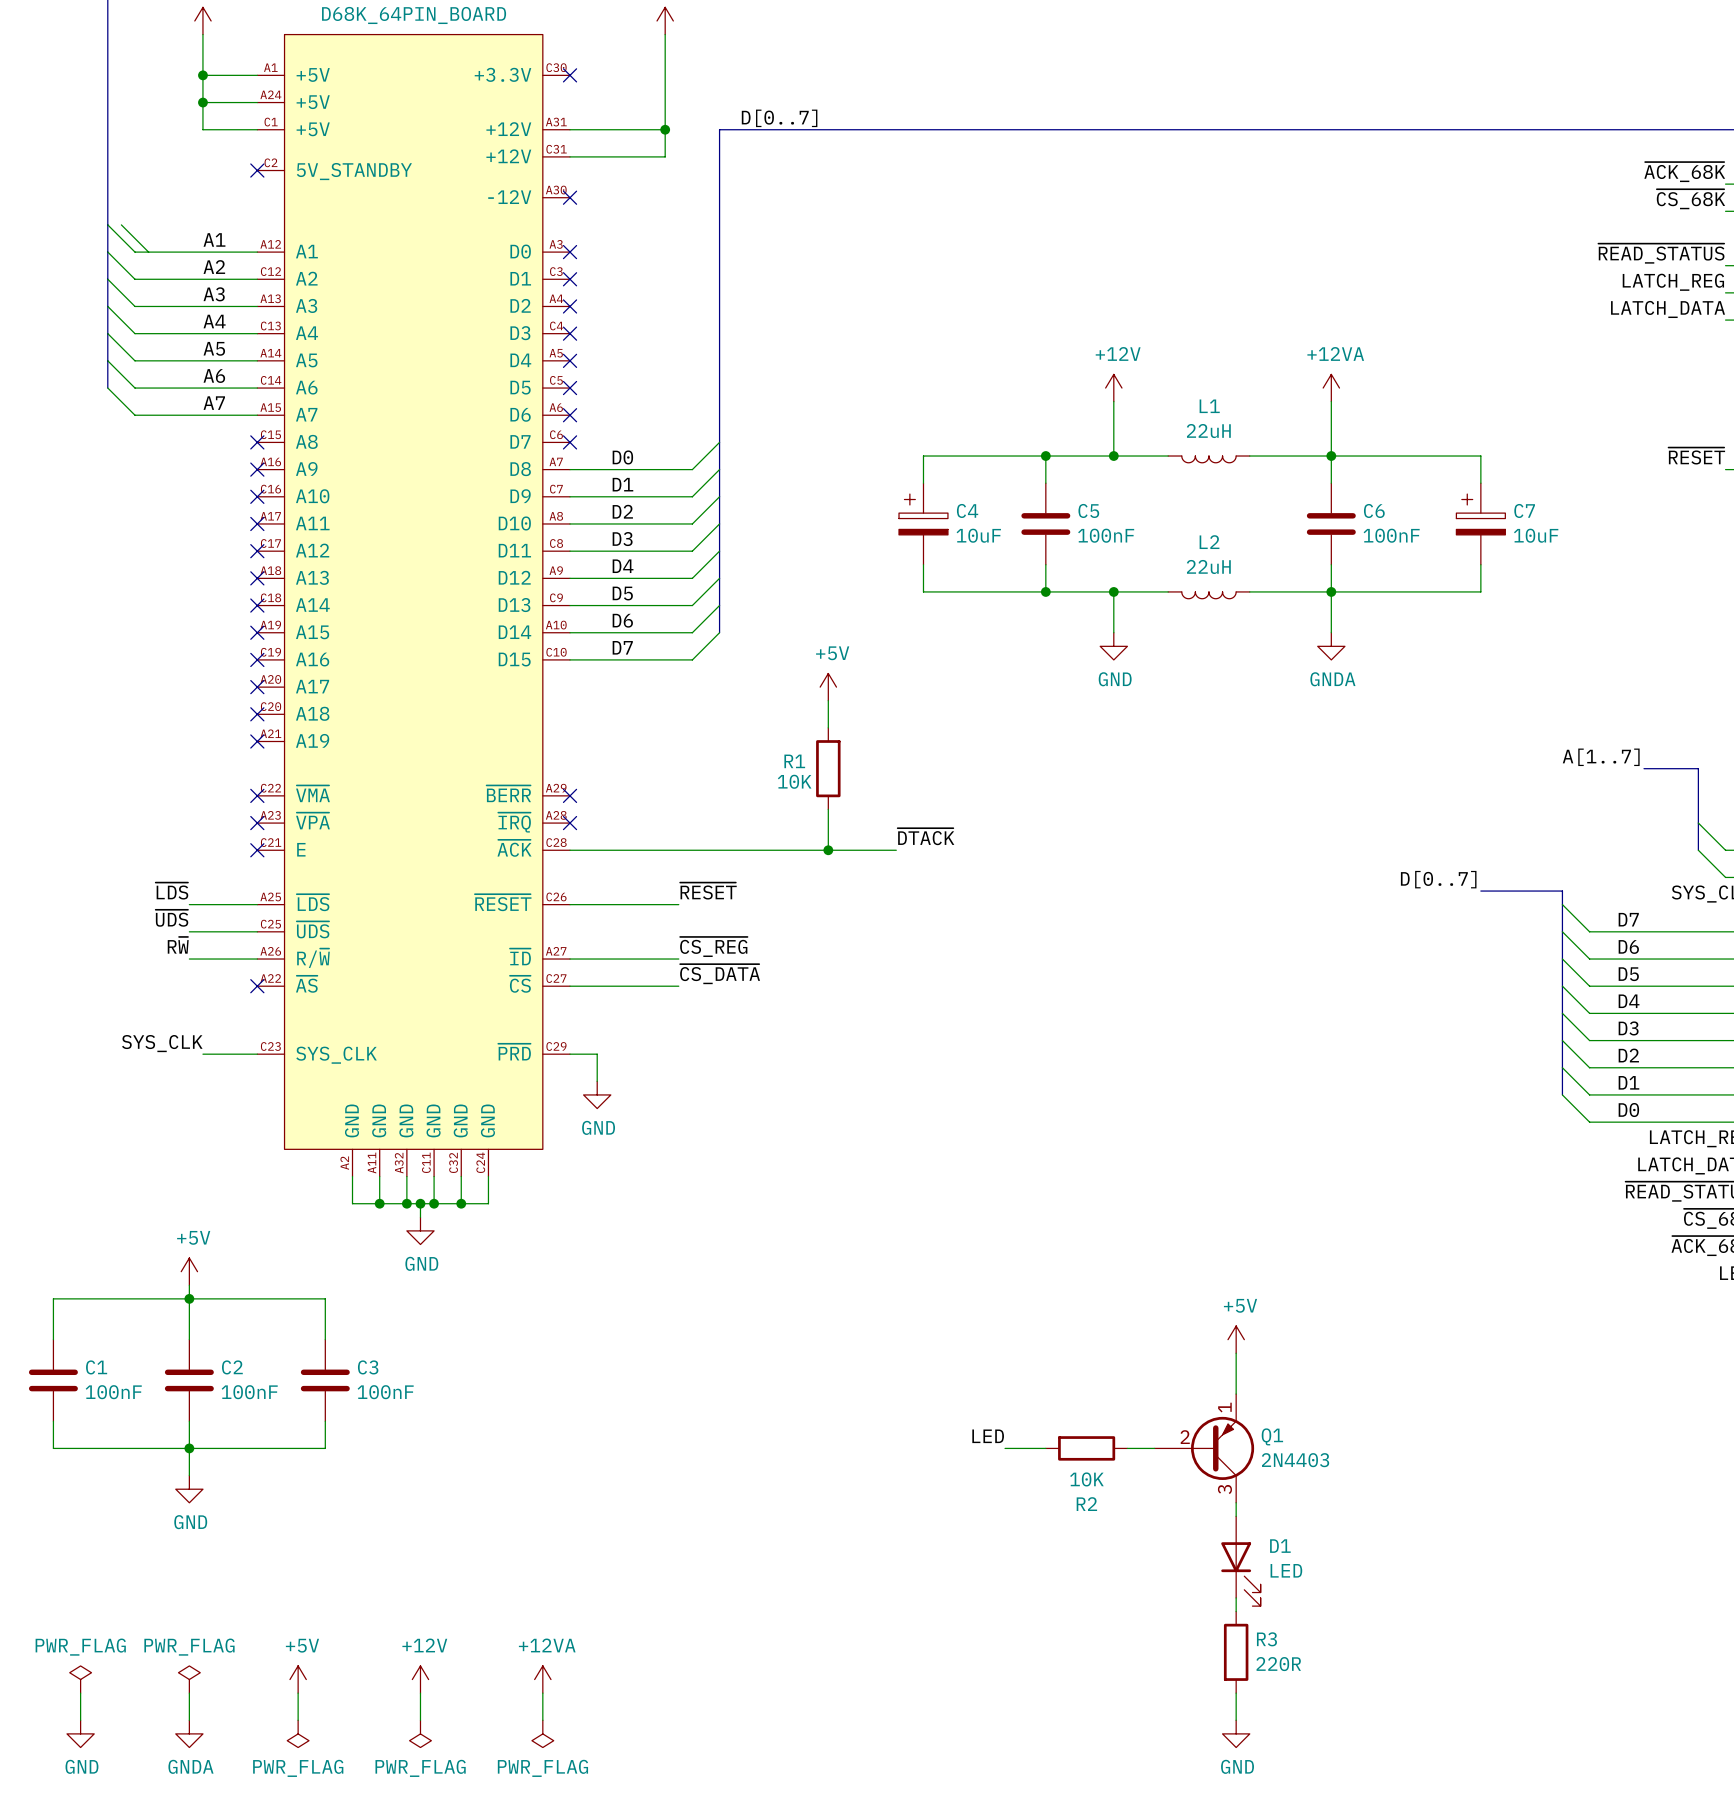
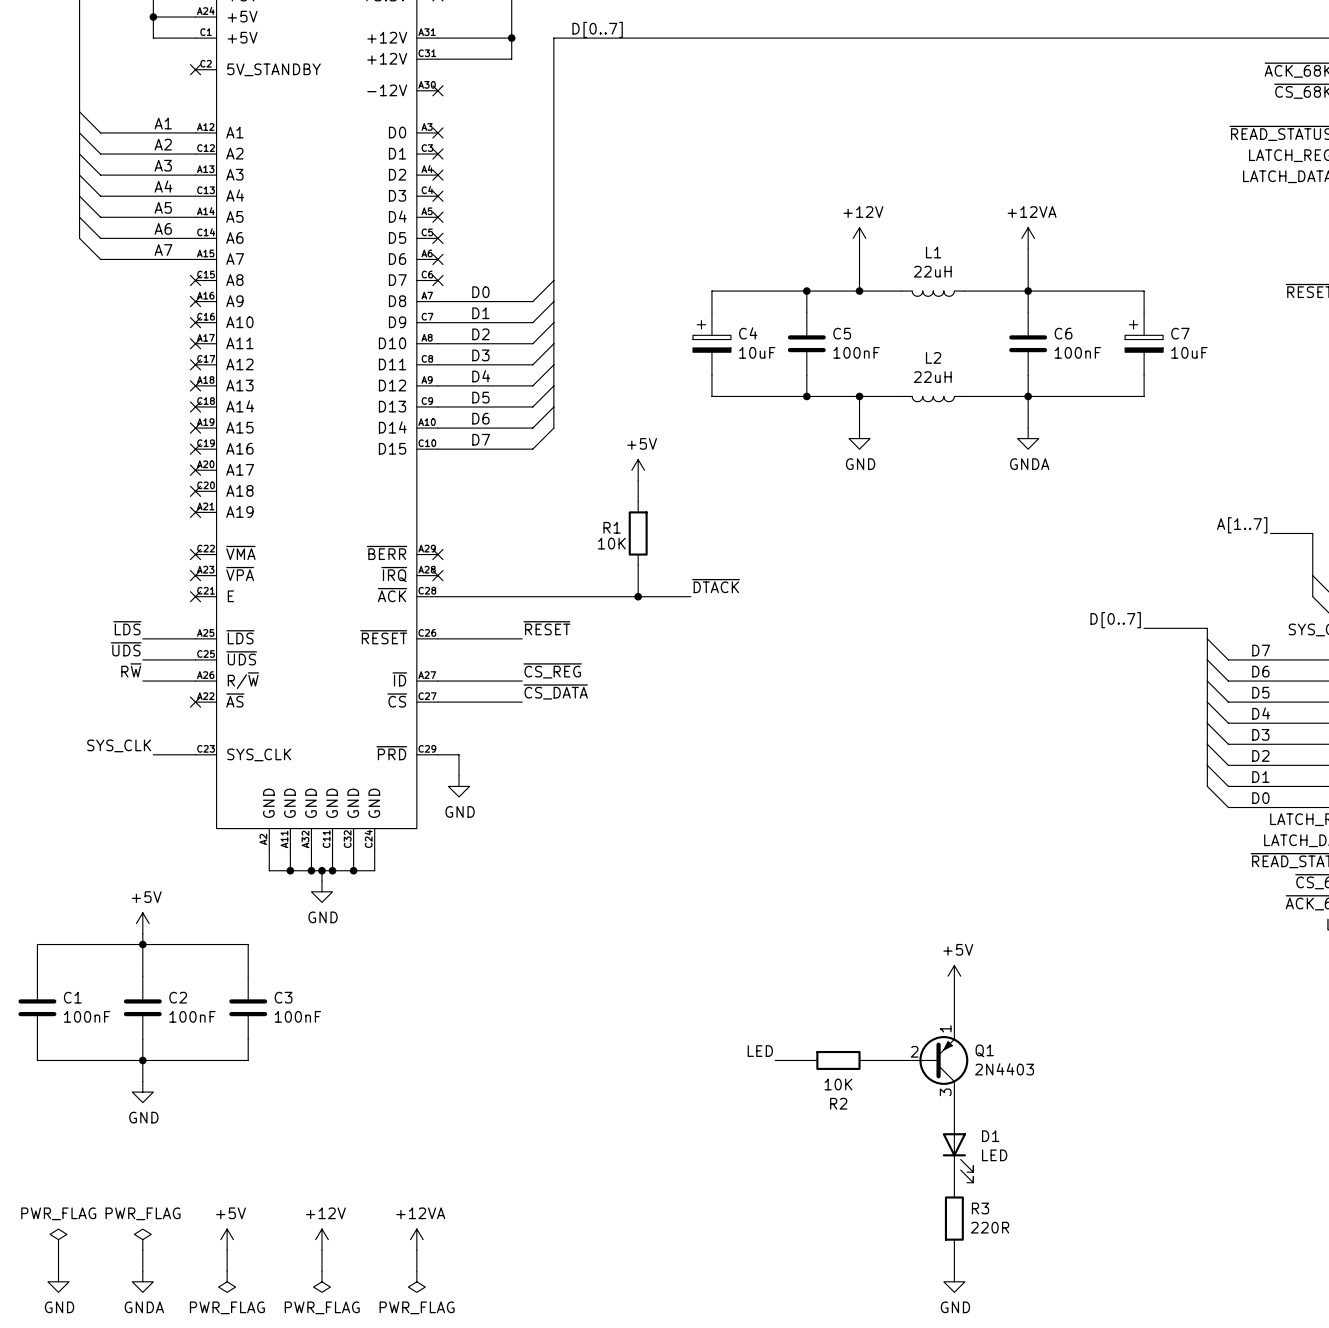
wire: (121, 224) (148, 252) -> none

